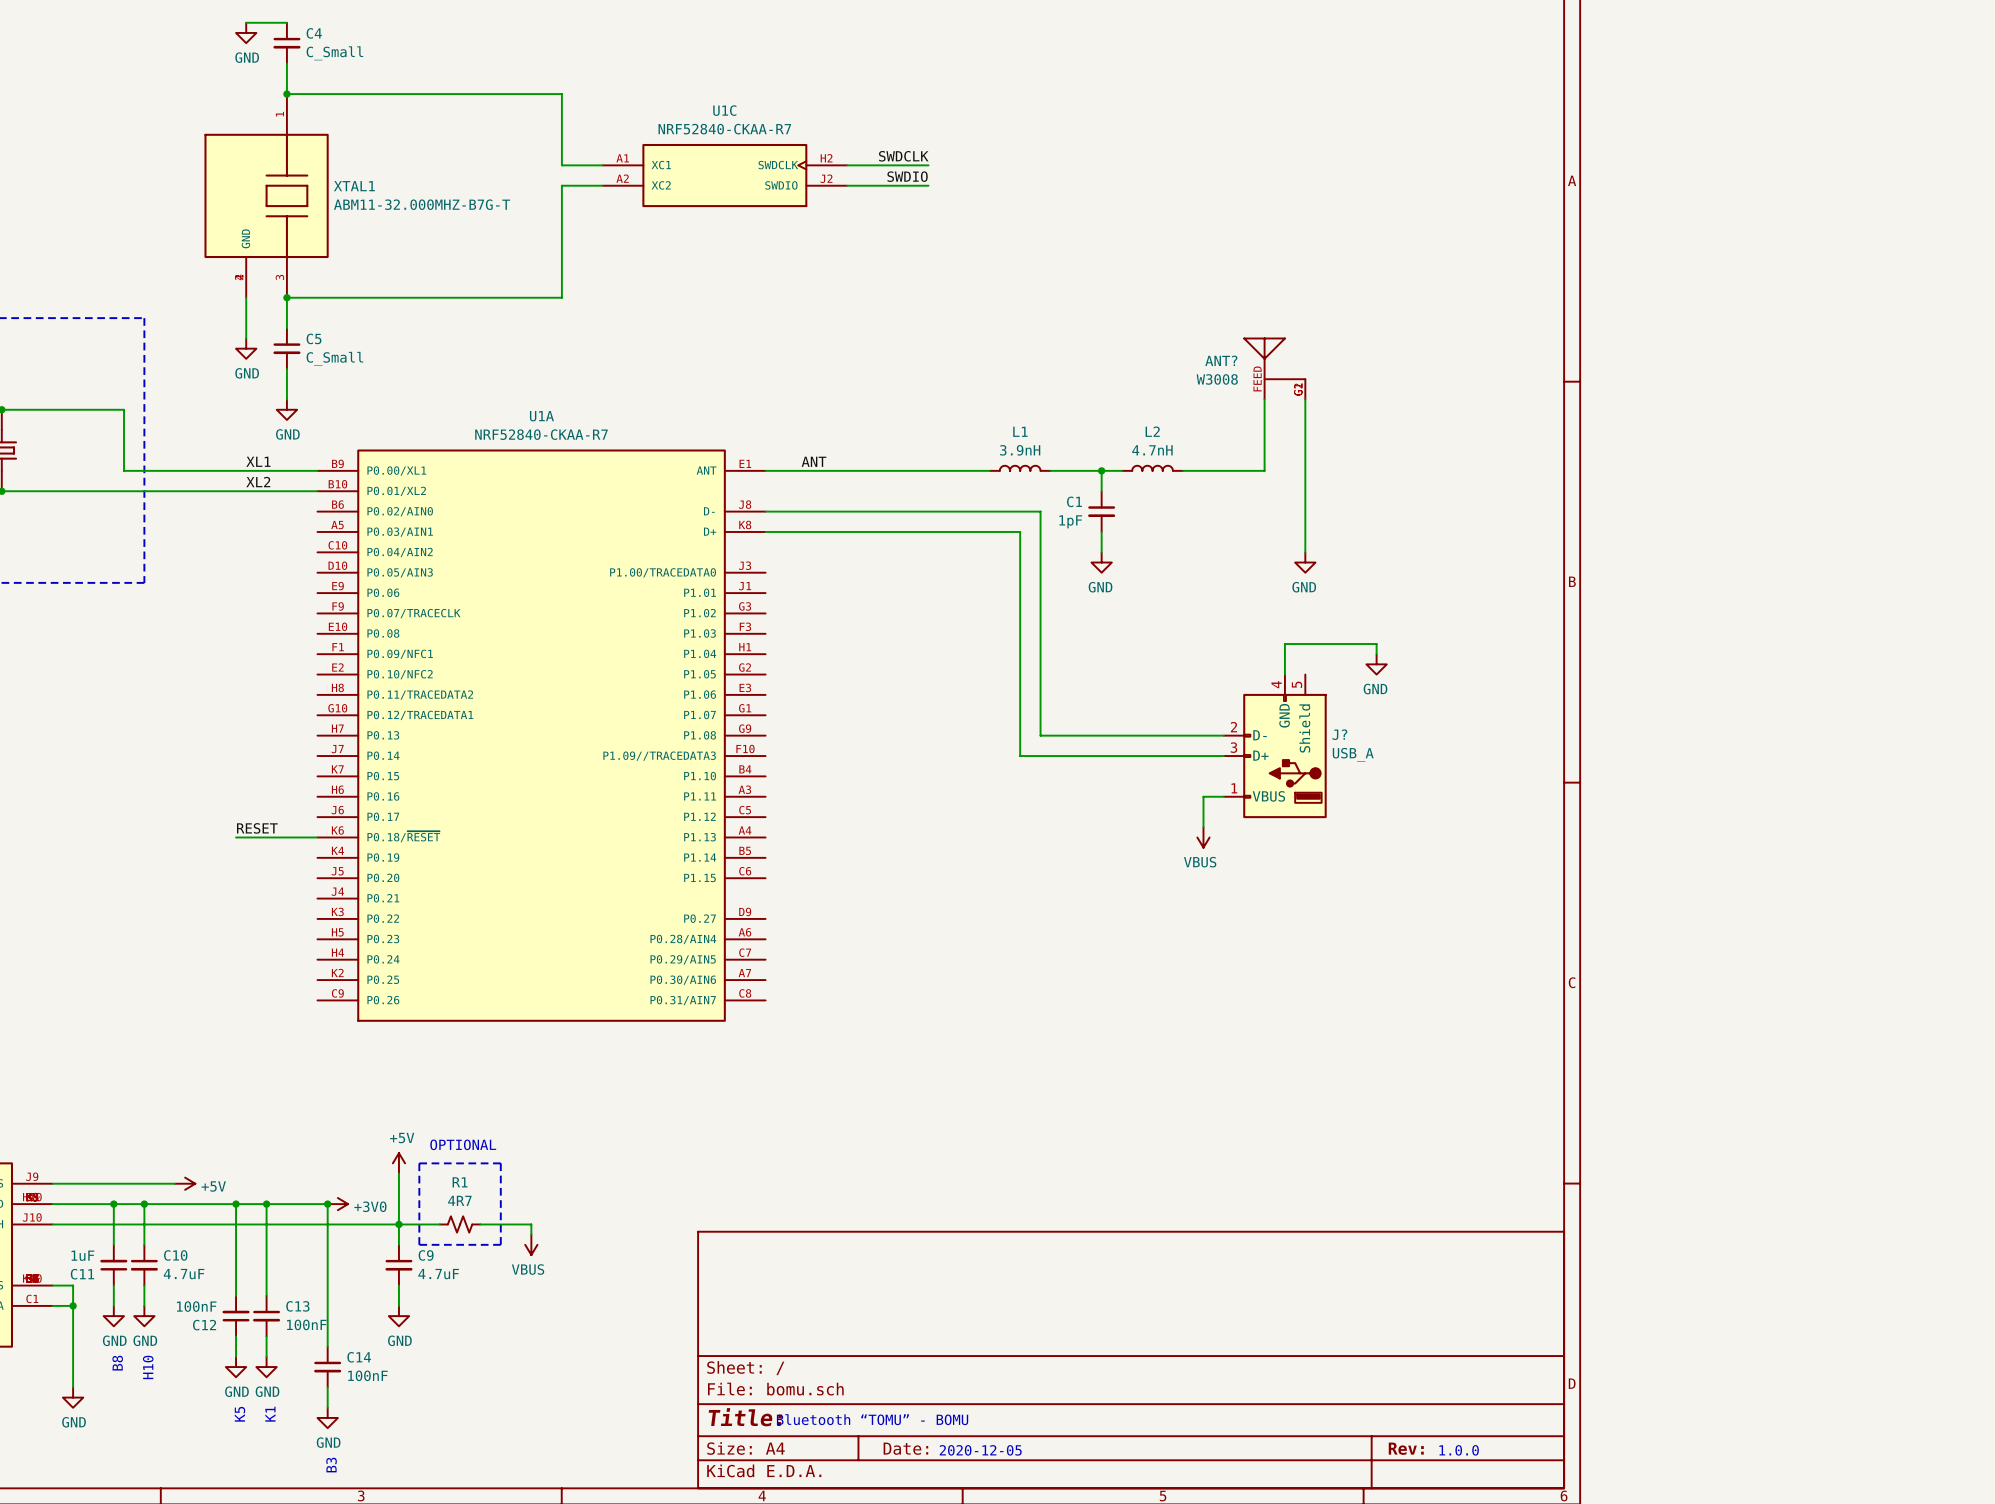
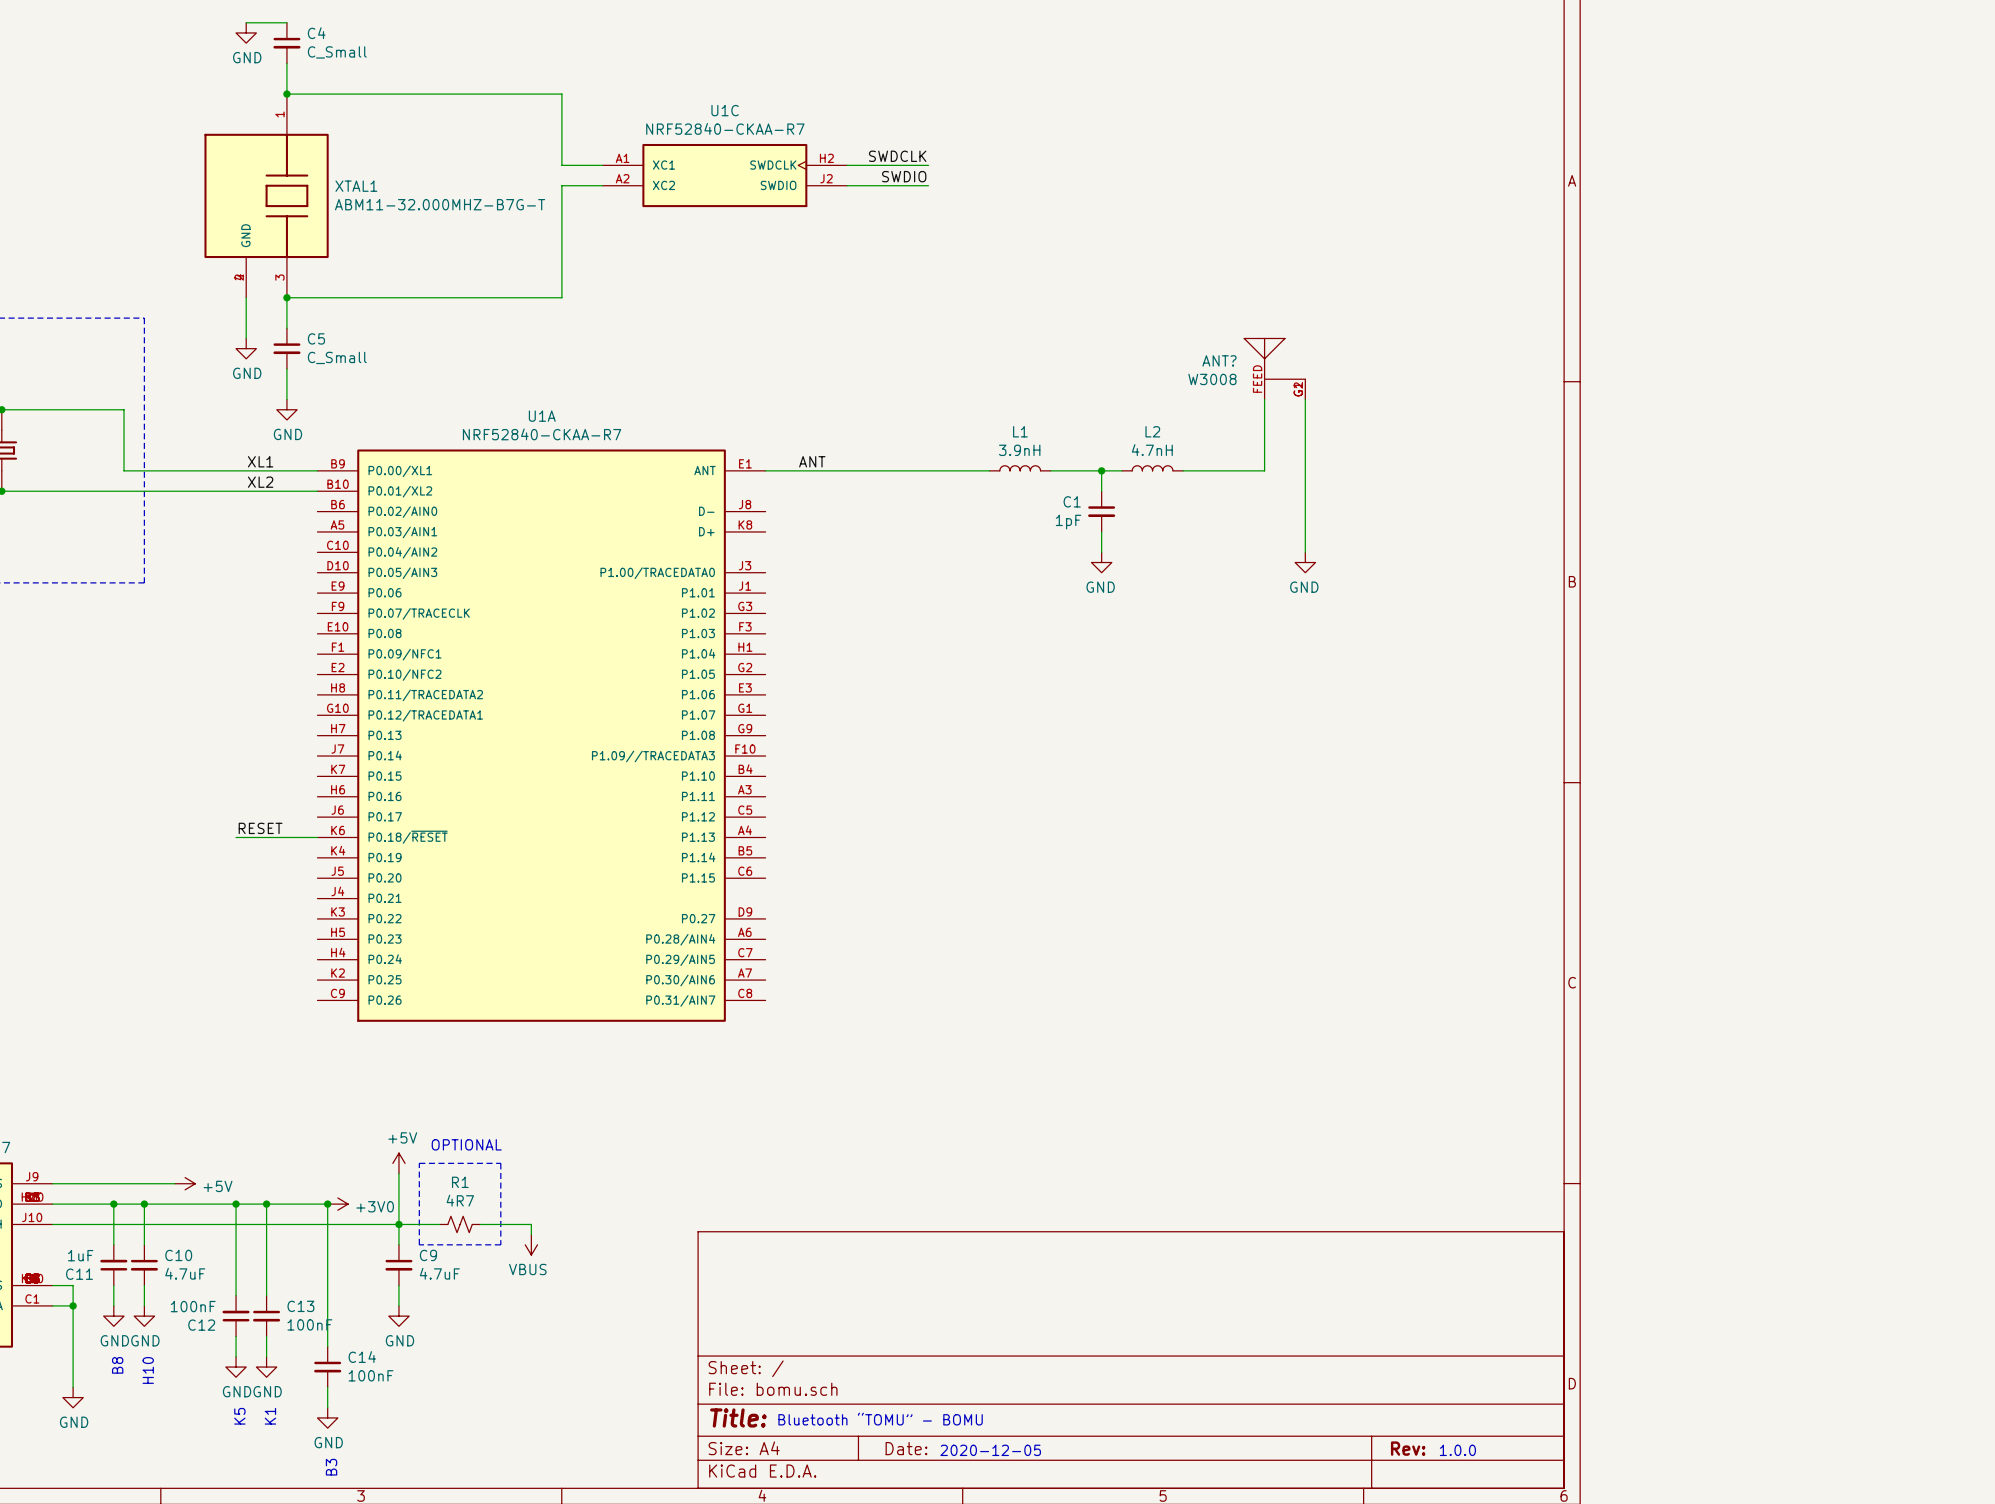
wire: (765, 511) (1040, 511) (1040, 735) (1223, 735) -> none
wire: (765, 531) (1020, 531) (1020, 756) (1223, 756) -> none
wire: (1376, 654) (1376, 643) (1284, 643) (1284, 674) -> none
power symbol: GND (1376, 664) -> none
J?: USB_A (1275, 746) -> none
wire: (1223, 796) (1203, 796) (1203, 827) -> none
power symbol: VBUS (1203, 837) -> none

